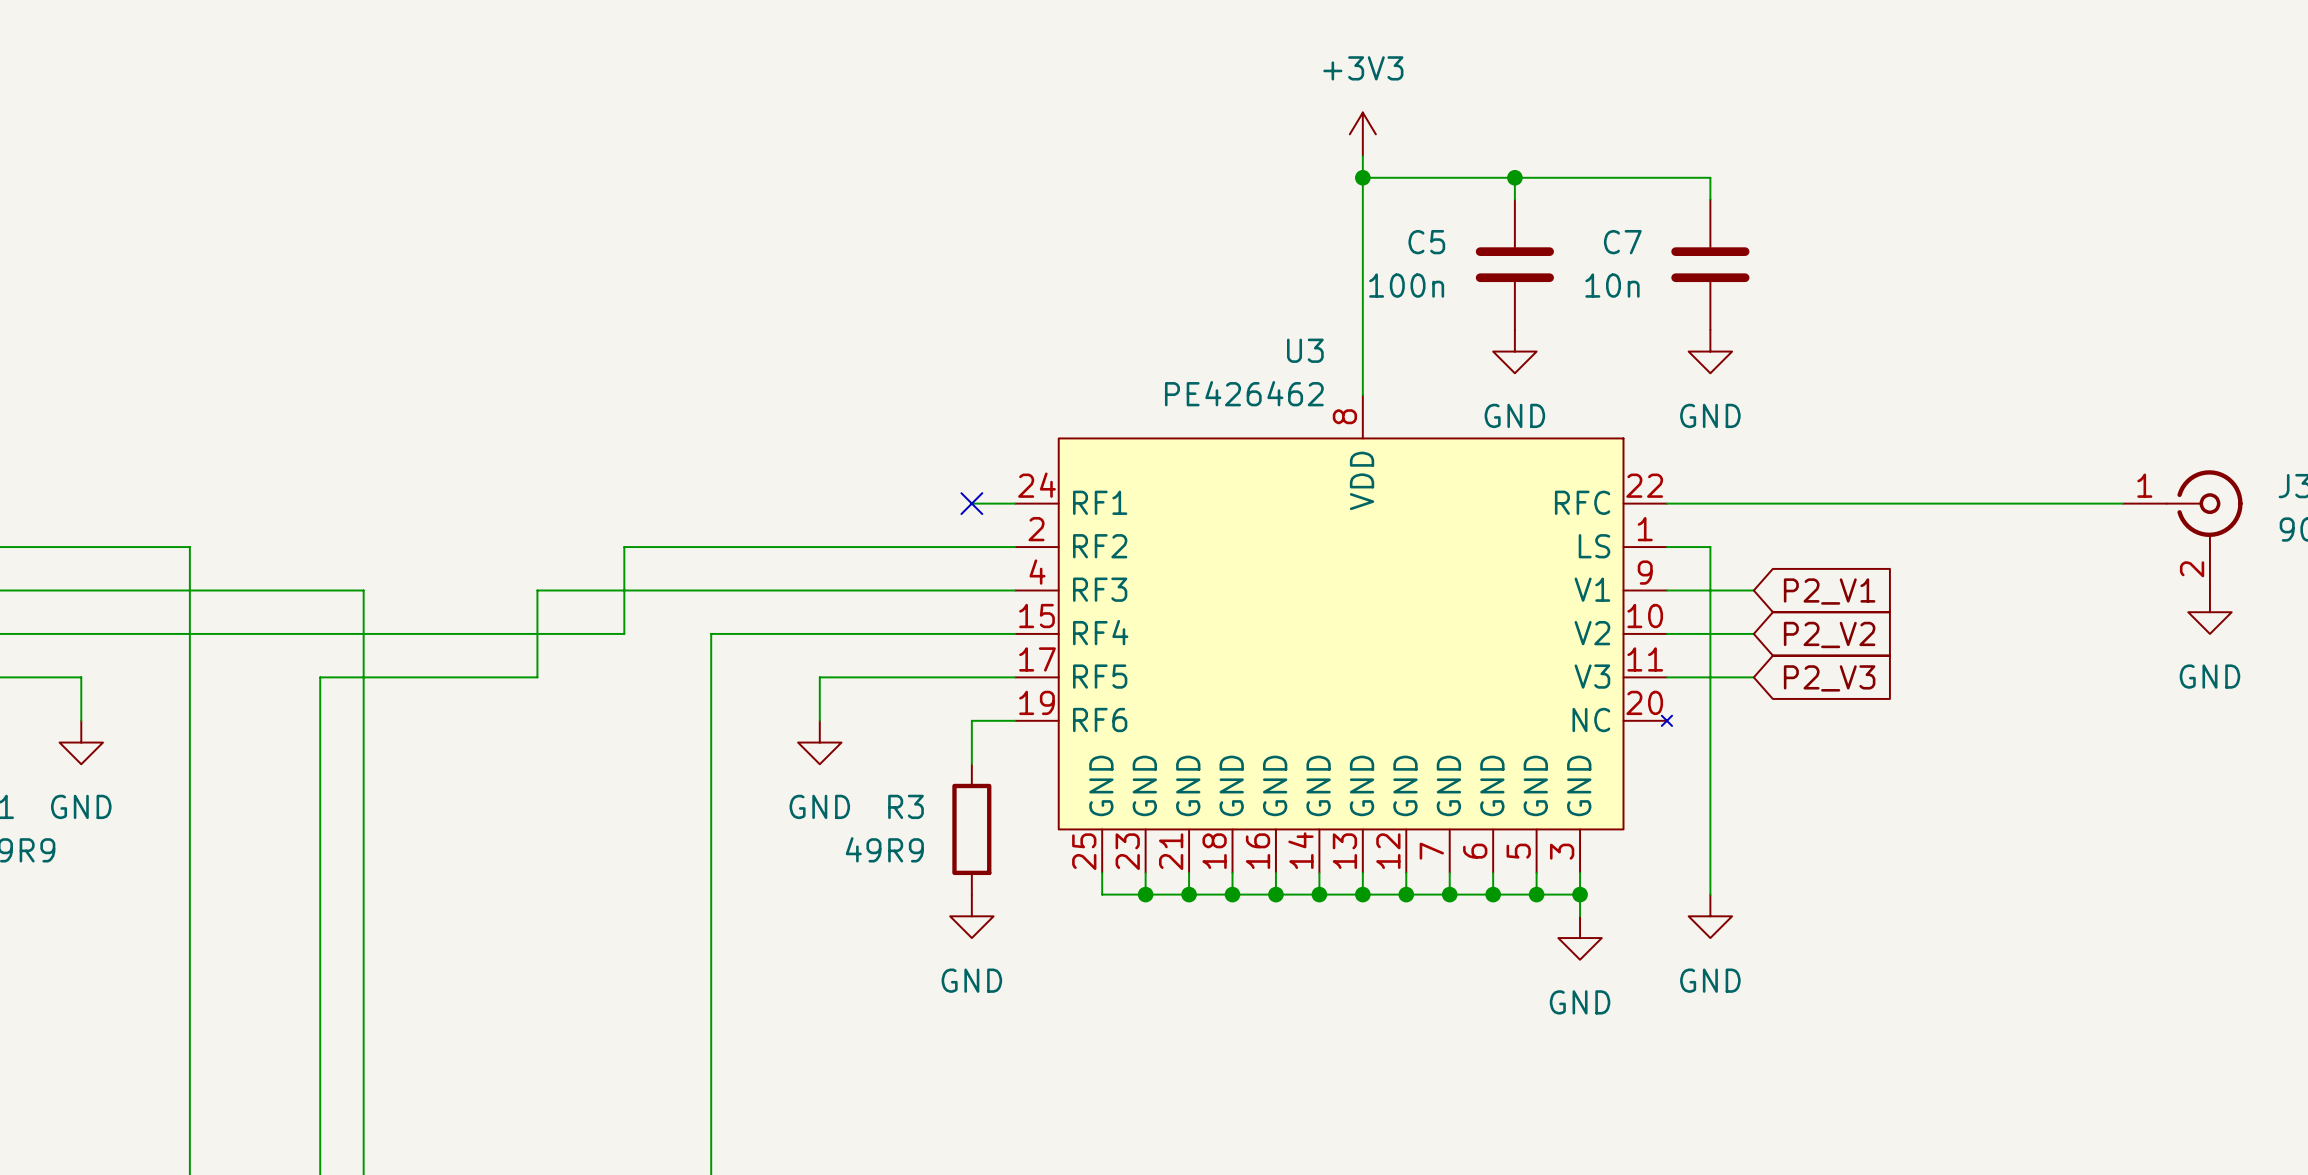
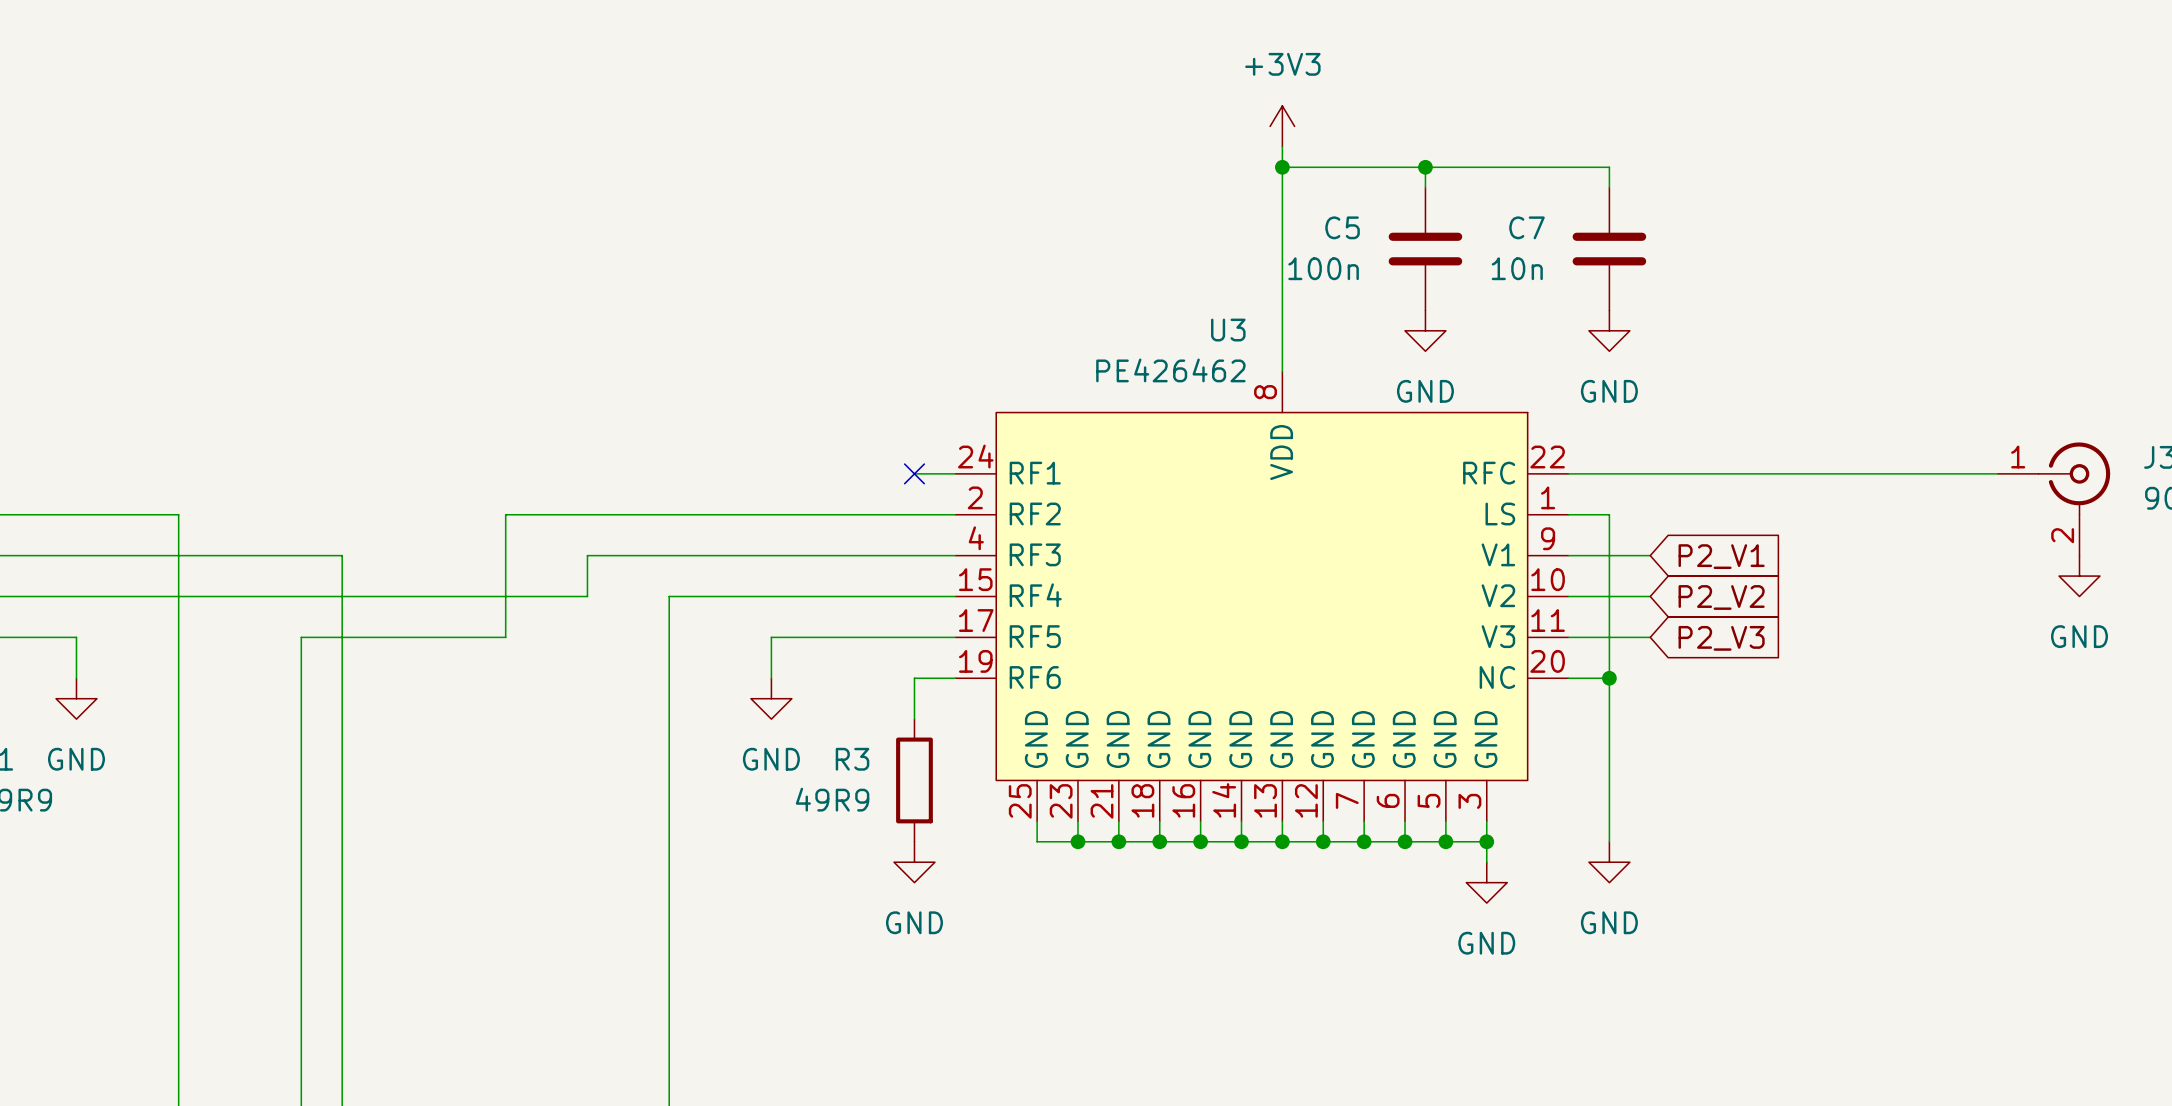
U3 symbol: [1015, 395, 1673, 873] -> [955, 371, 1569, 822]
wire: (624, 547) (624, 590) (537, 590) -> (587, 514) (505, 514) (505, 555)
wire: none -> (1568, 678) (1609, 678)
junction: none -> (1609, 678)

